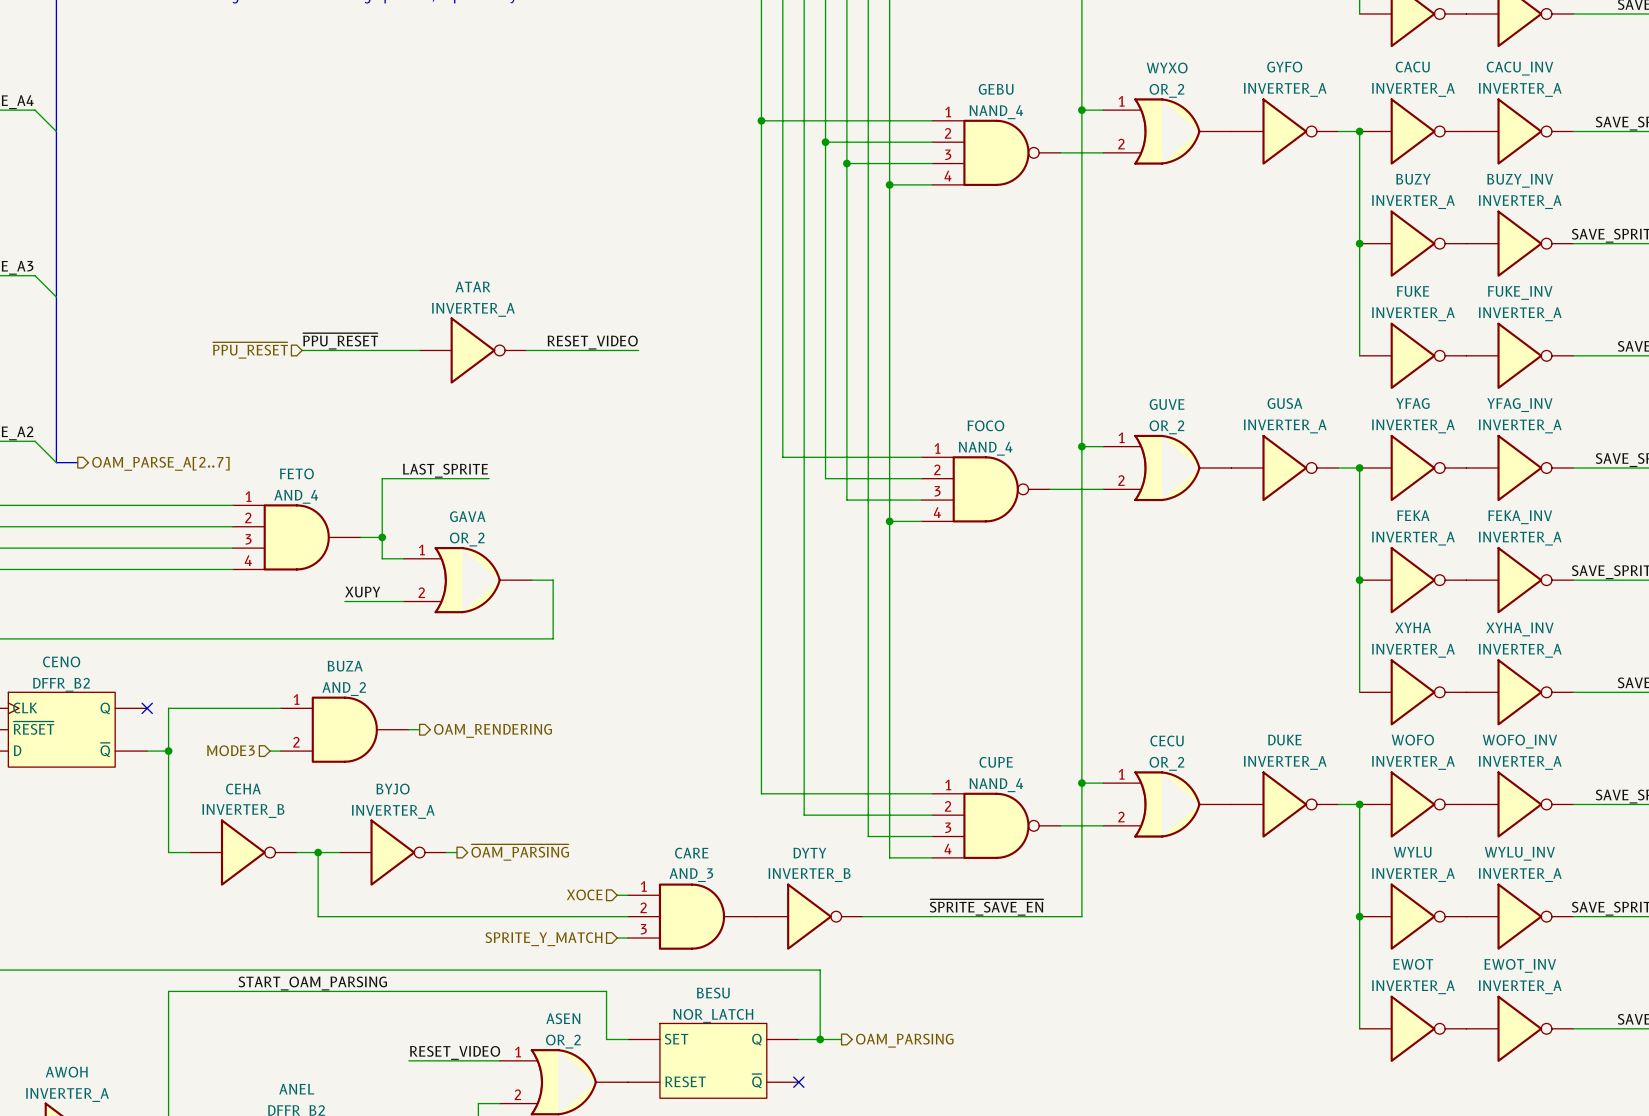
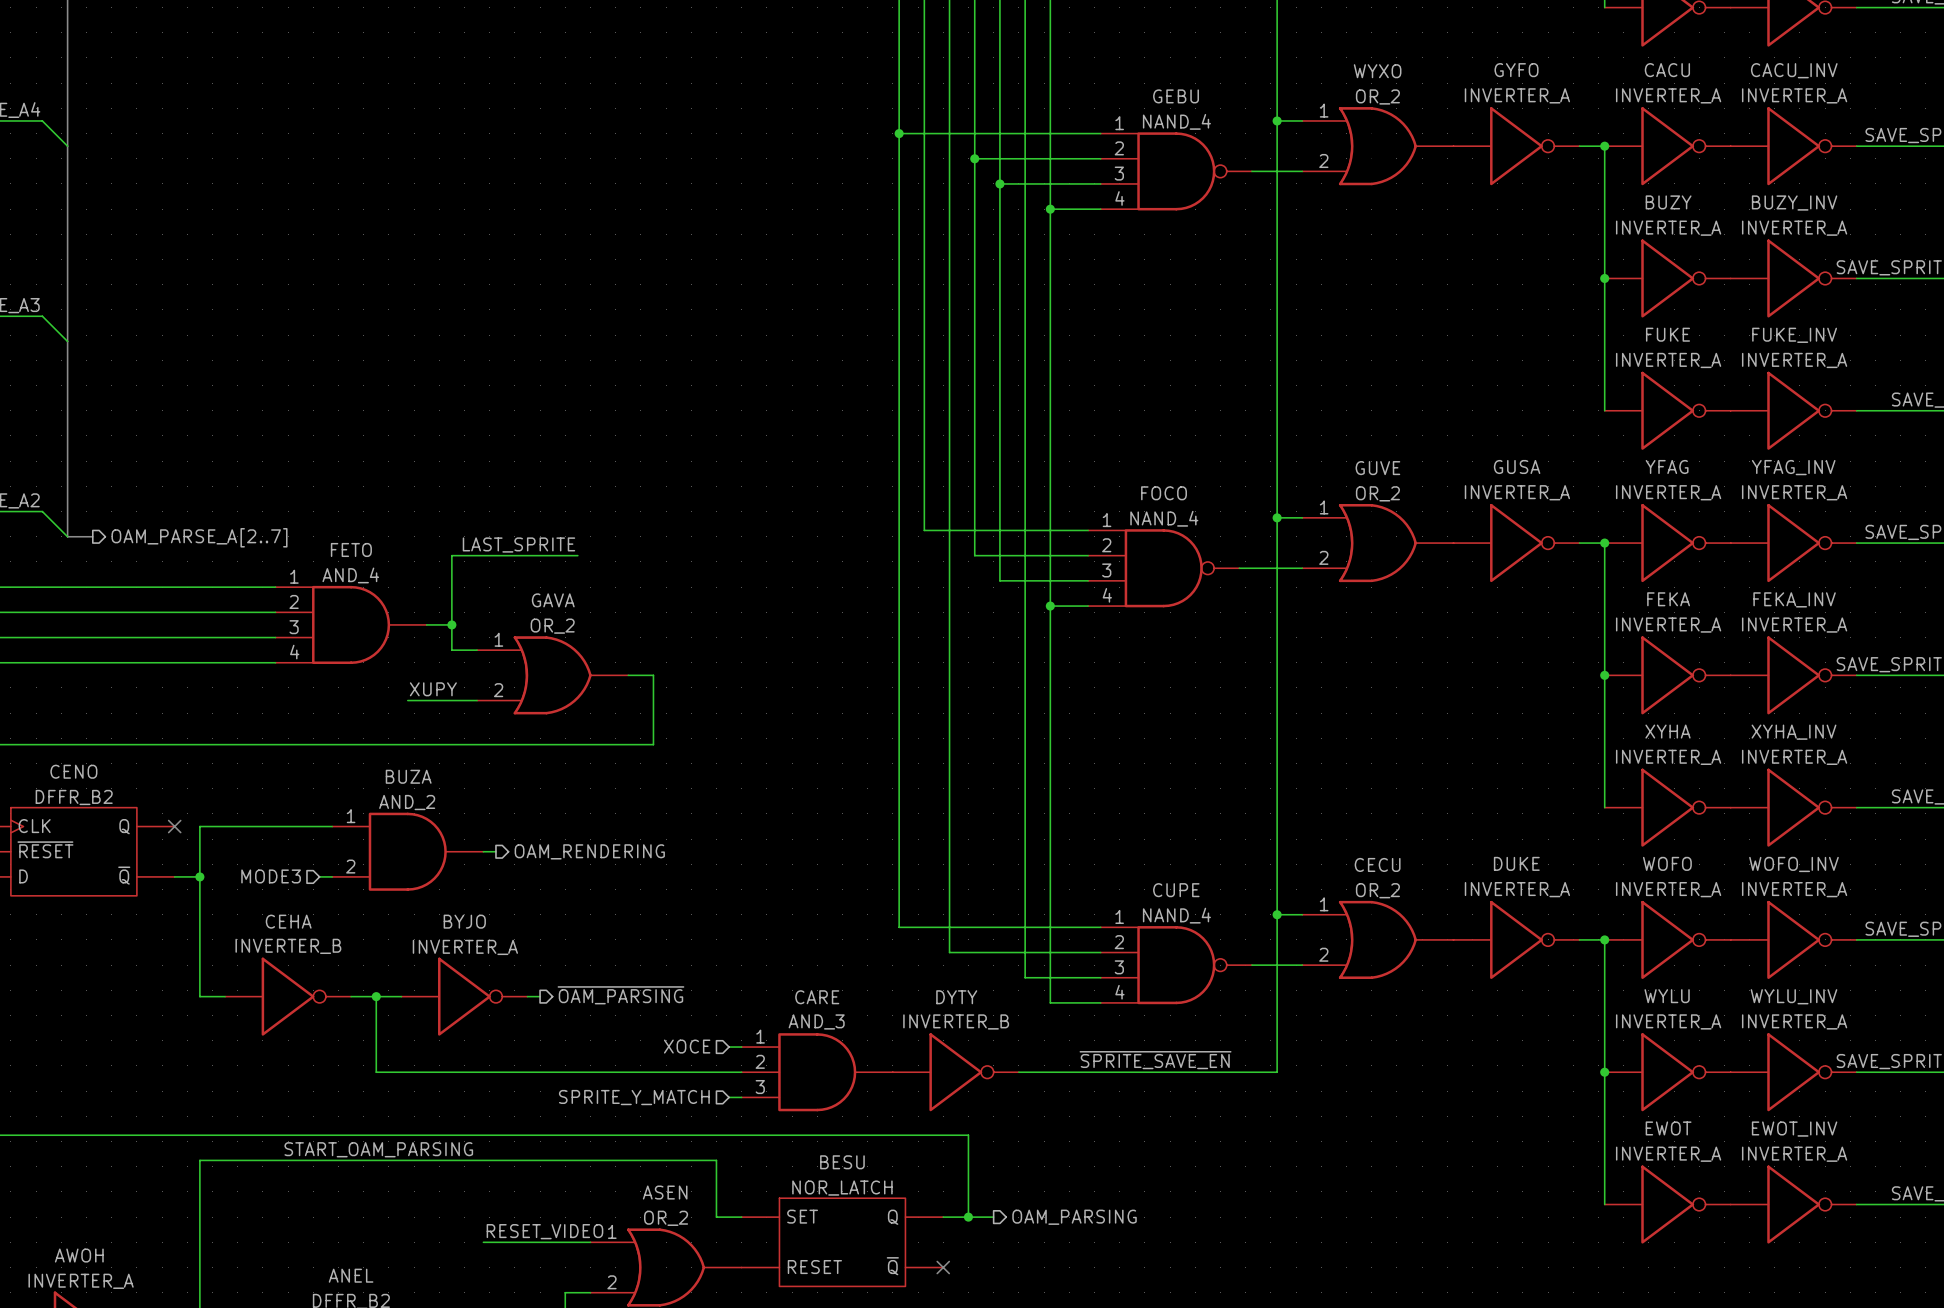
label: ~{PPU_RESET} (340, 341) -> none
label: RESET_VIDEO (592, 342) -> none
hierarchical label: ~{PPU_RESET} (250, 350) -> none
wire: (302, 350) (419, 350) -> none
ATAR: INVERTER_A (473, 350) -> none
wire: (526, 350) (638, 350) -> none

